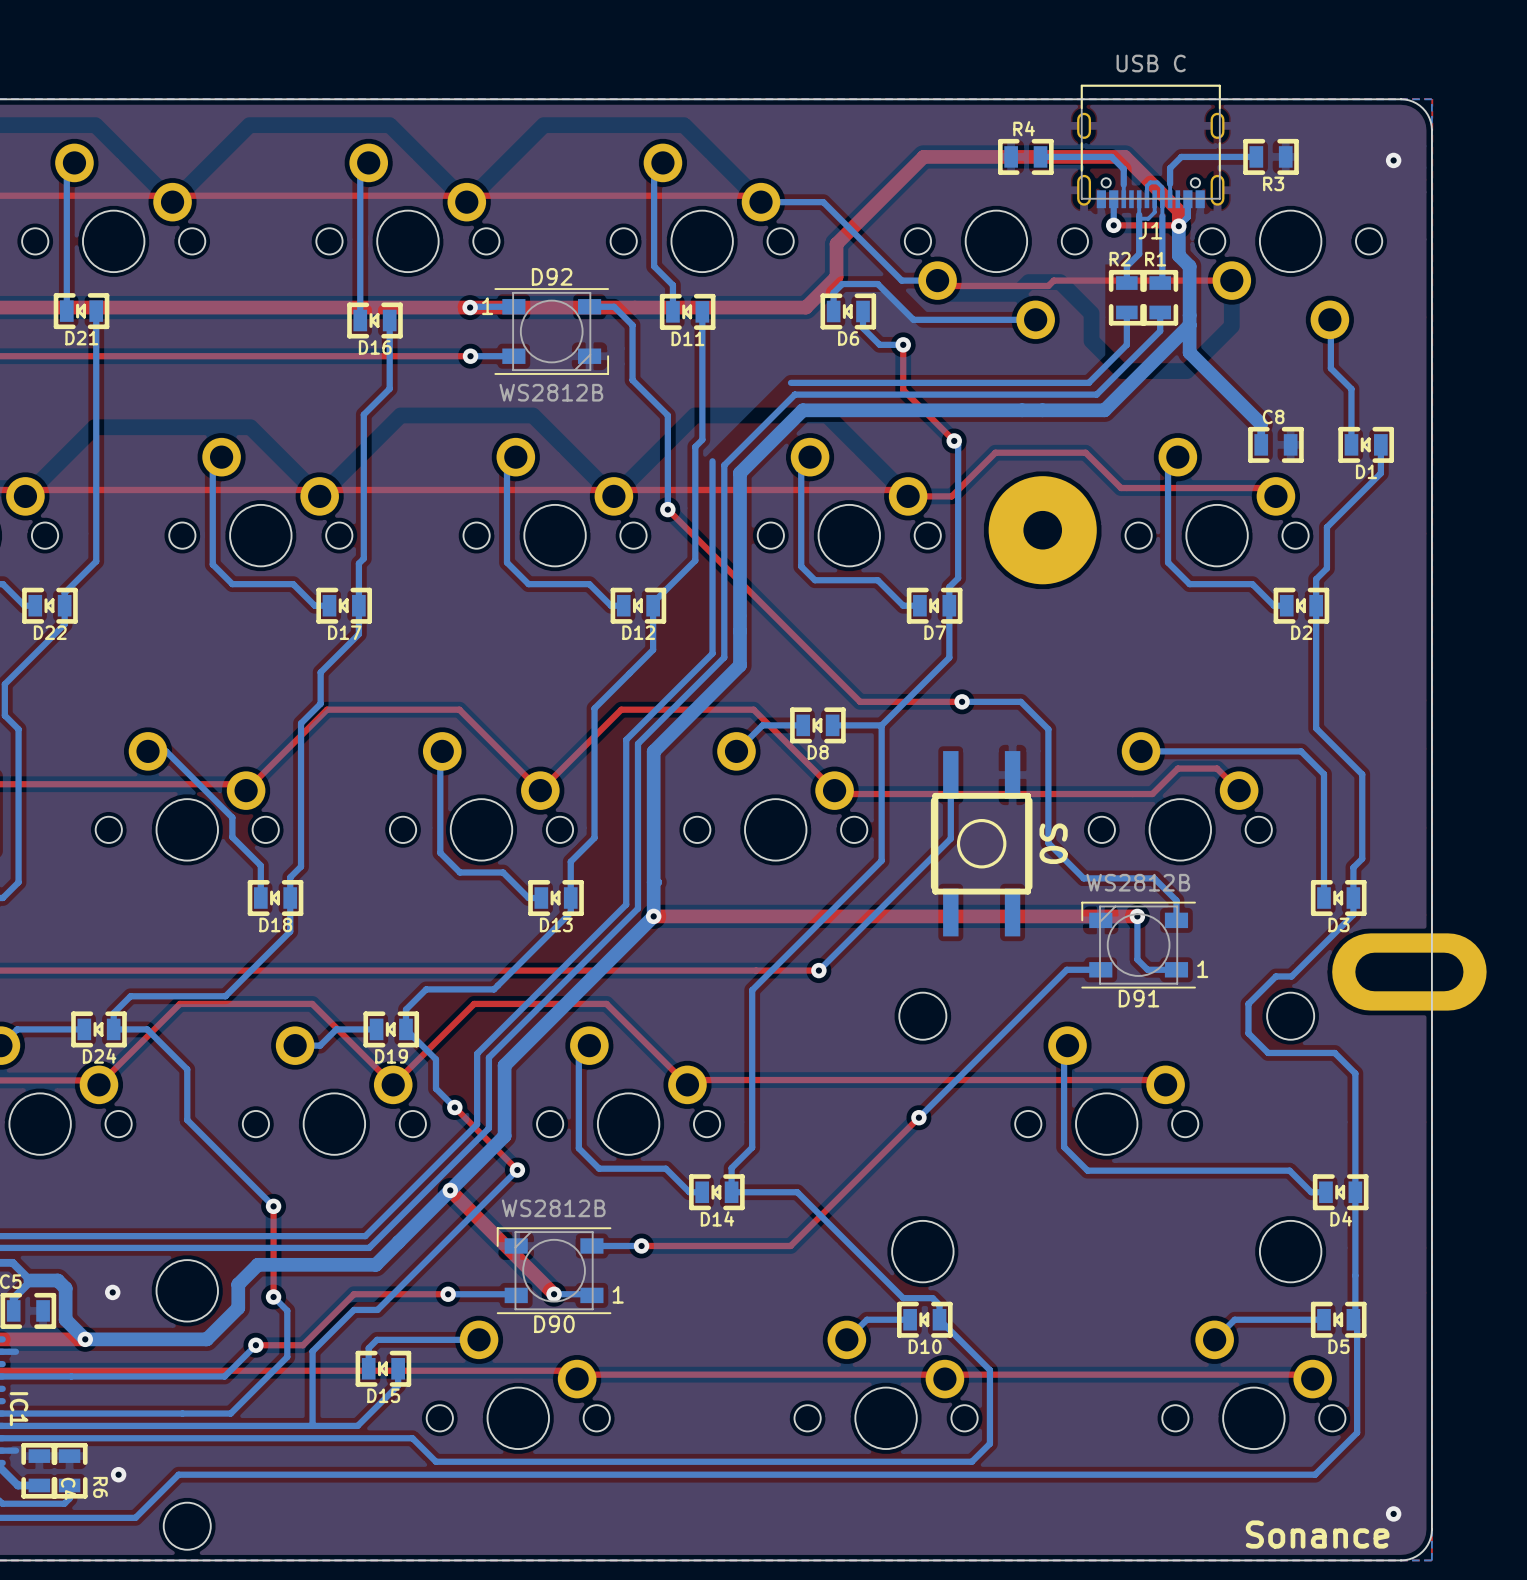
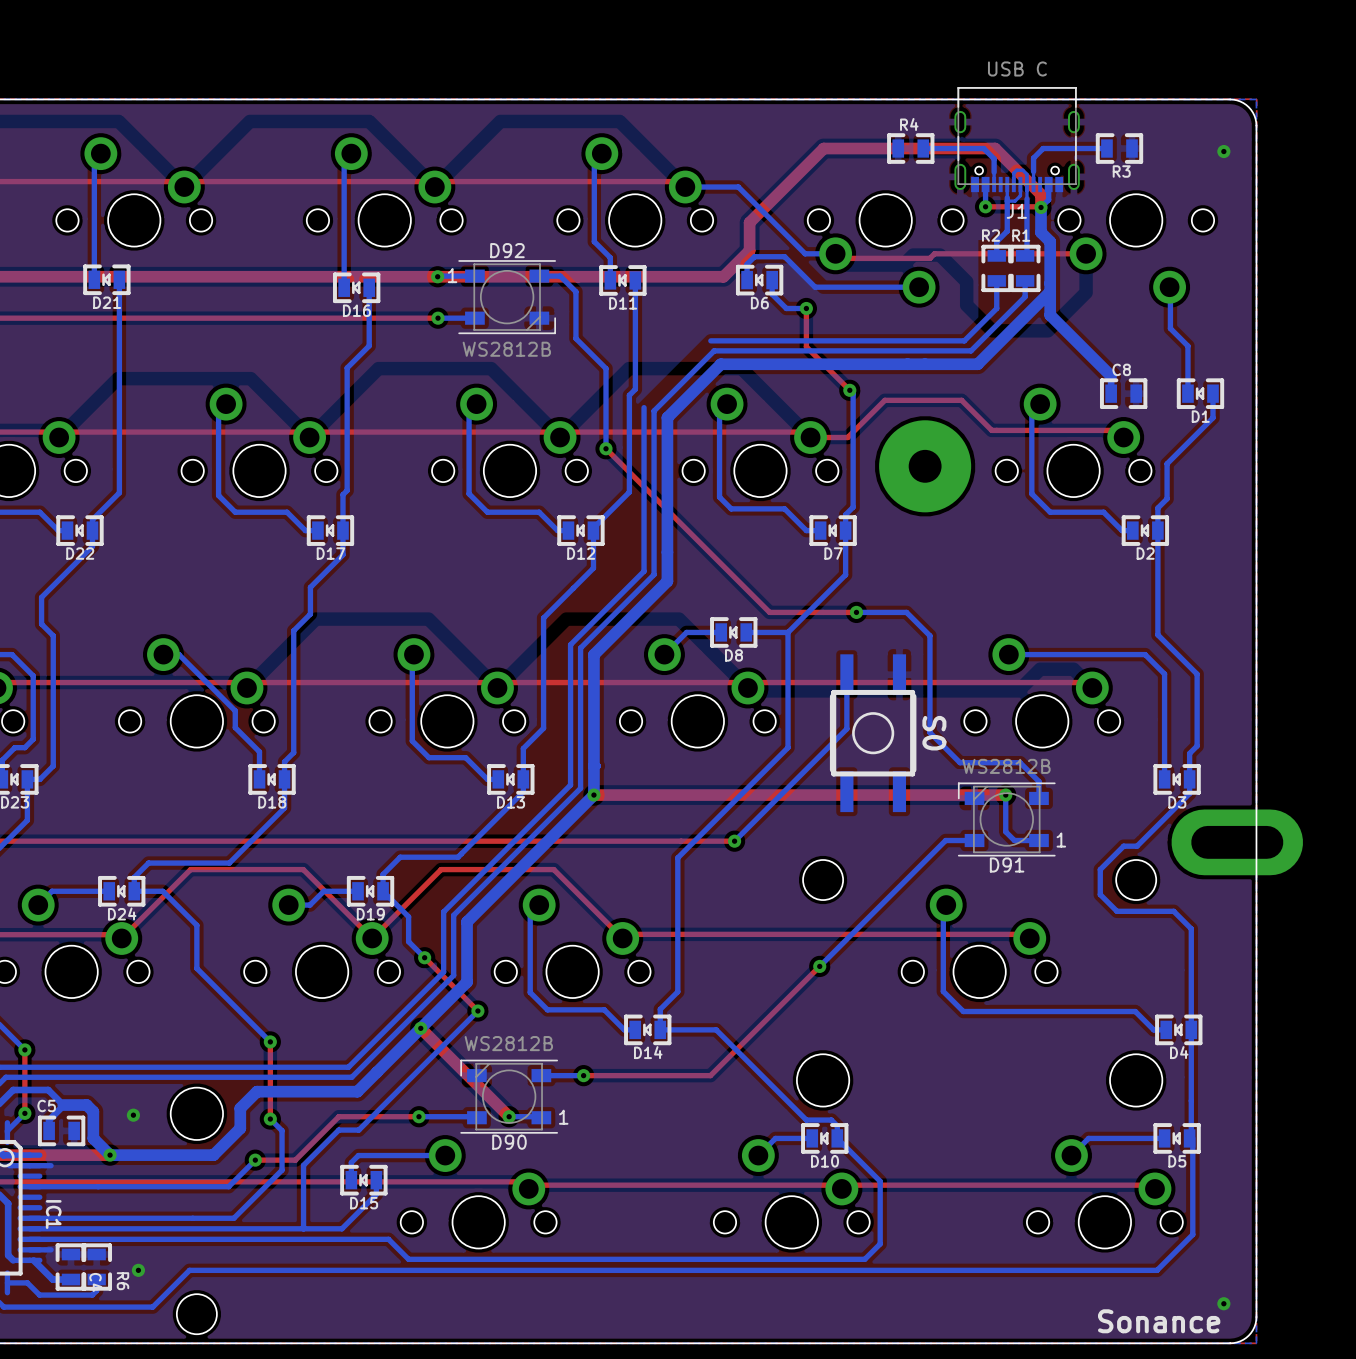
top track: (252, 784) (327, 709) (459, 709) (540, 790) -> (252, 682) (485, 682) (491, 687) (497, 687)
top track: (546, 784) (621, 709) (753, 709) (834, 790) -> none
top track: (1239, 790) (1217, 768) (1177, 768) (1152, 794) (825, 794) -> (1092, 687) (1086, 682) (753, 682) (747, 687) (742, 682) (502, 682)

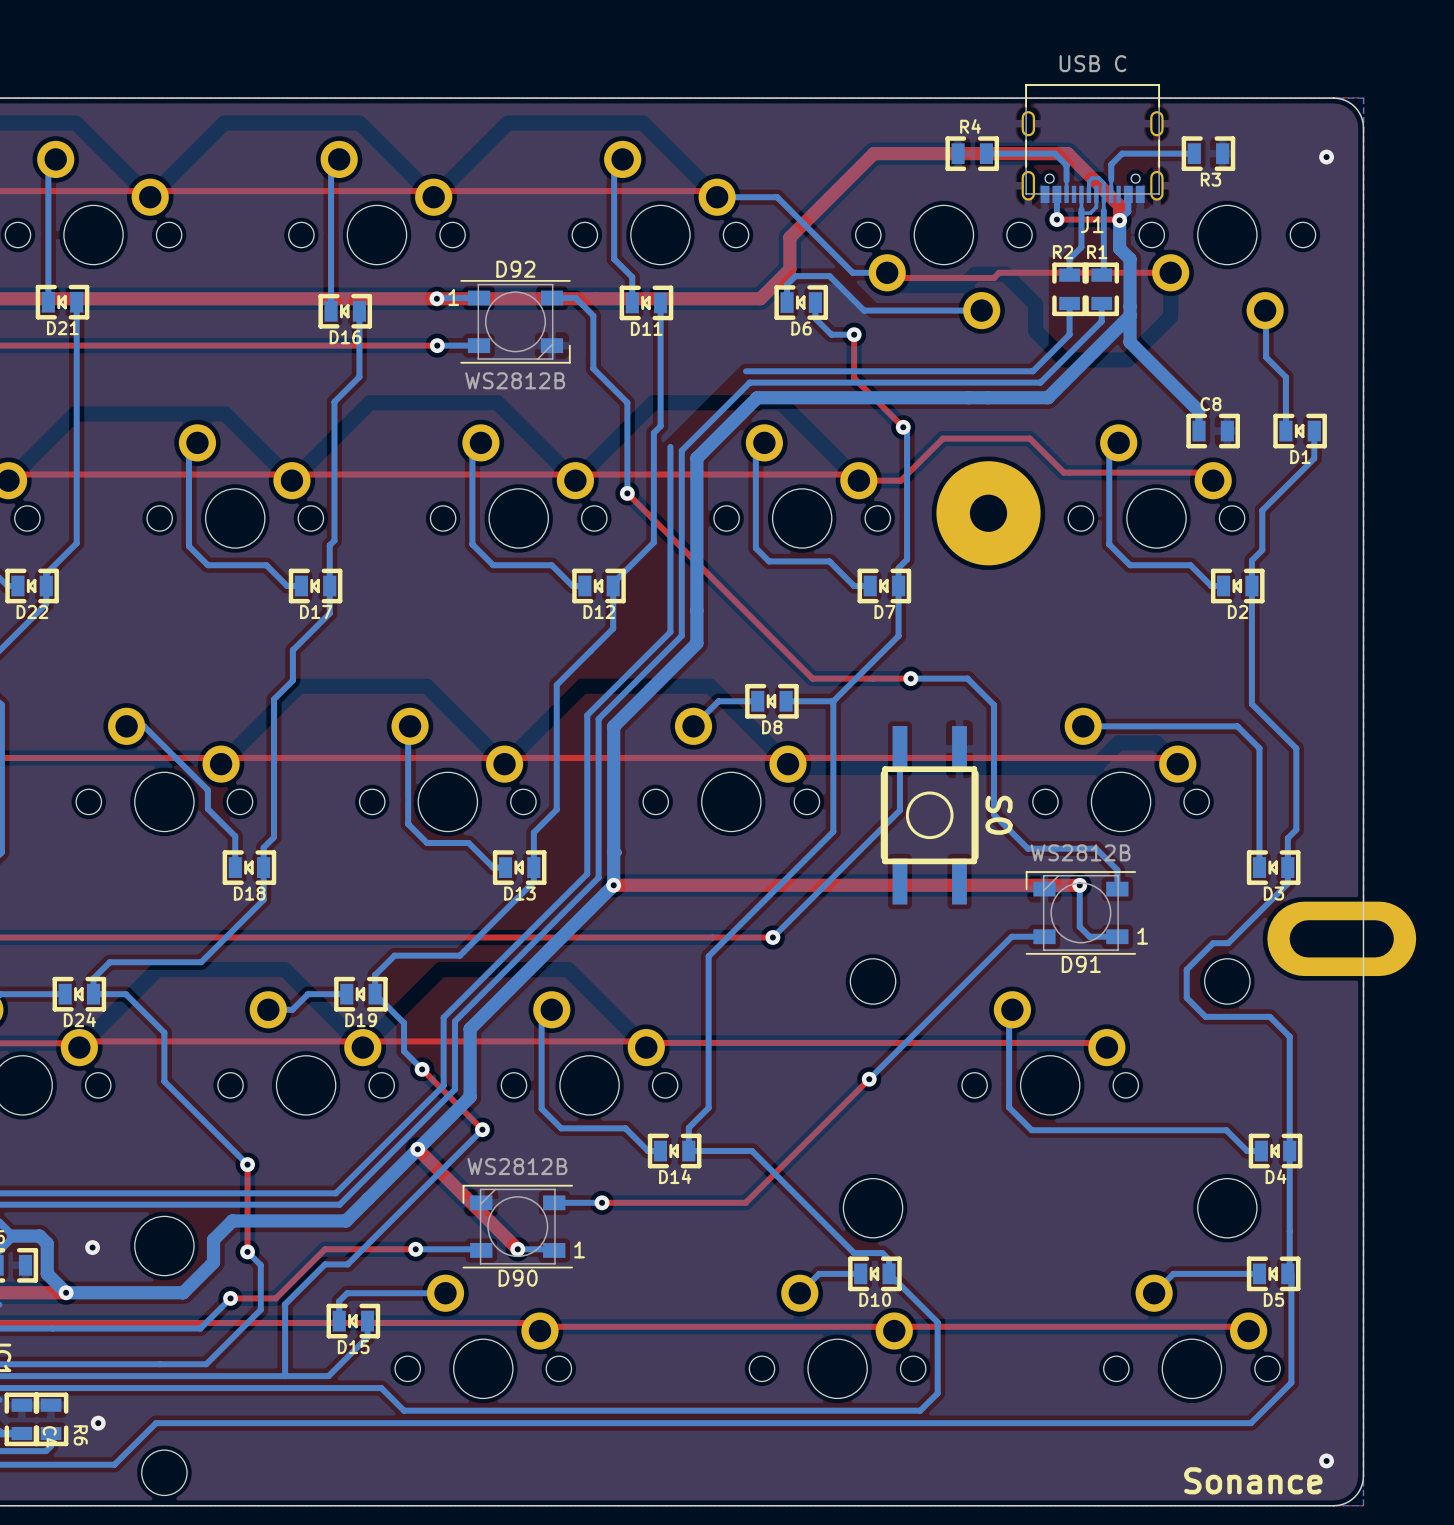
top track: (127, 933) (190, 869) (303, 869) (372, 938) -> (85, 1041) (359, 1041) (362, 1047)
top track: (377, 933) (441, 869) (553, 869) (622, 938) -> (368, 1041) (638, 1041) (646, 1047)

